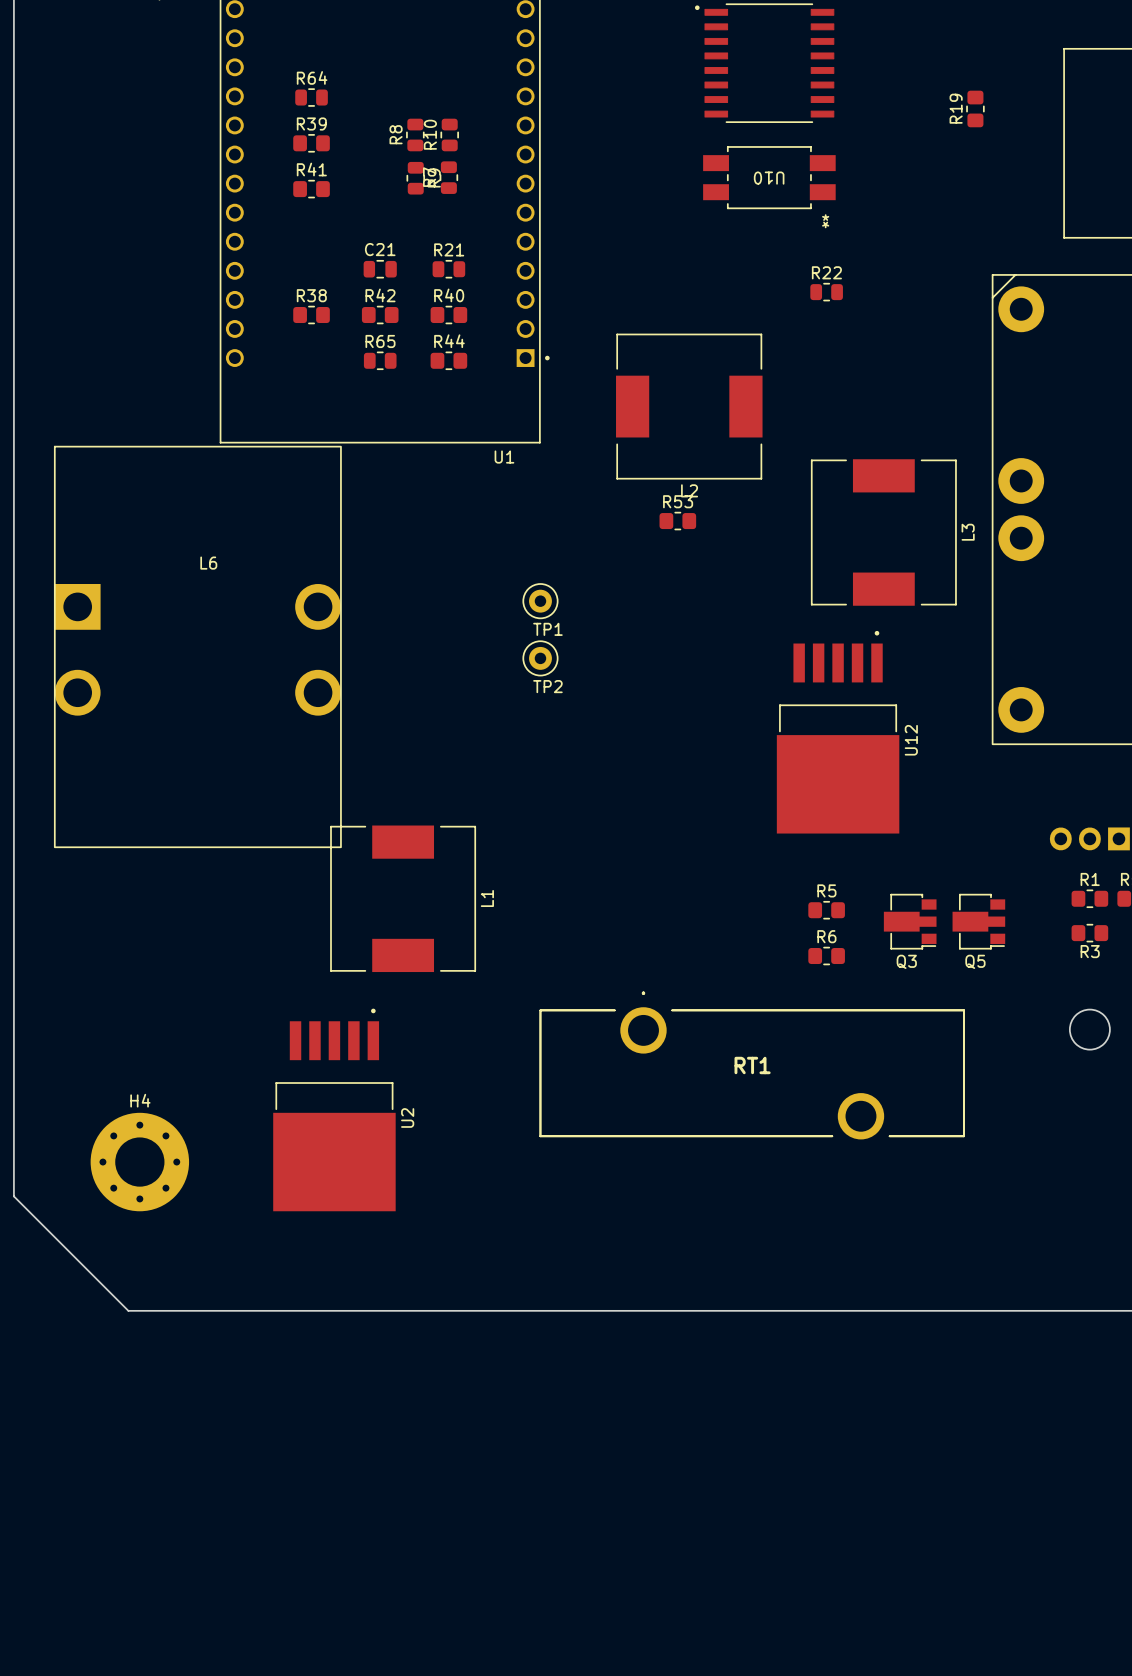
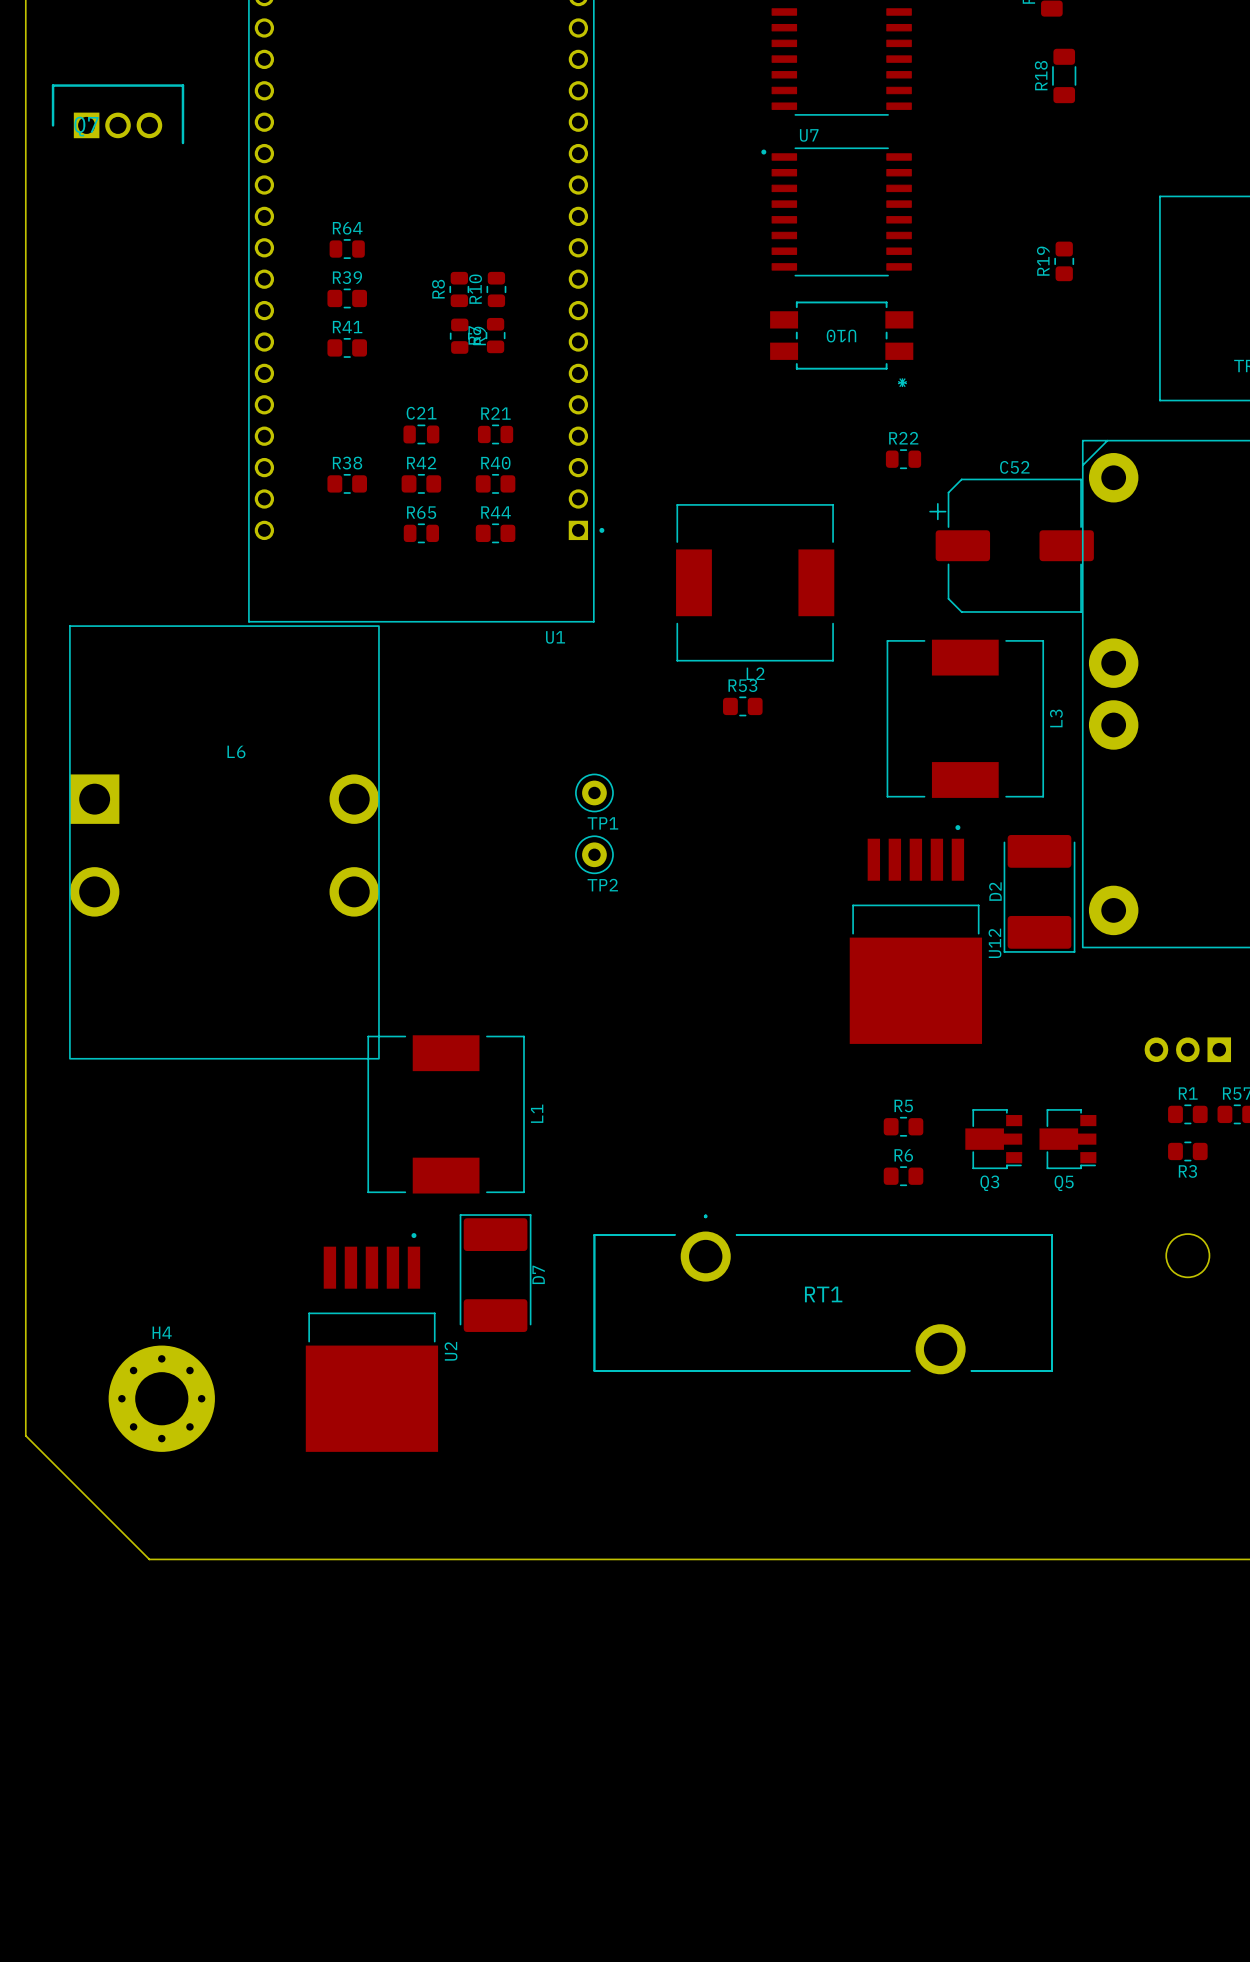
C52: none -> (1011, 545)
D2: none -> (1039, 893)
D7: none -> (495, 1273)

